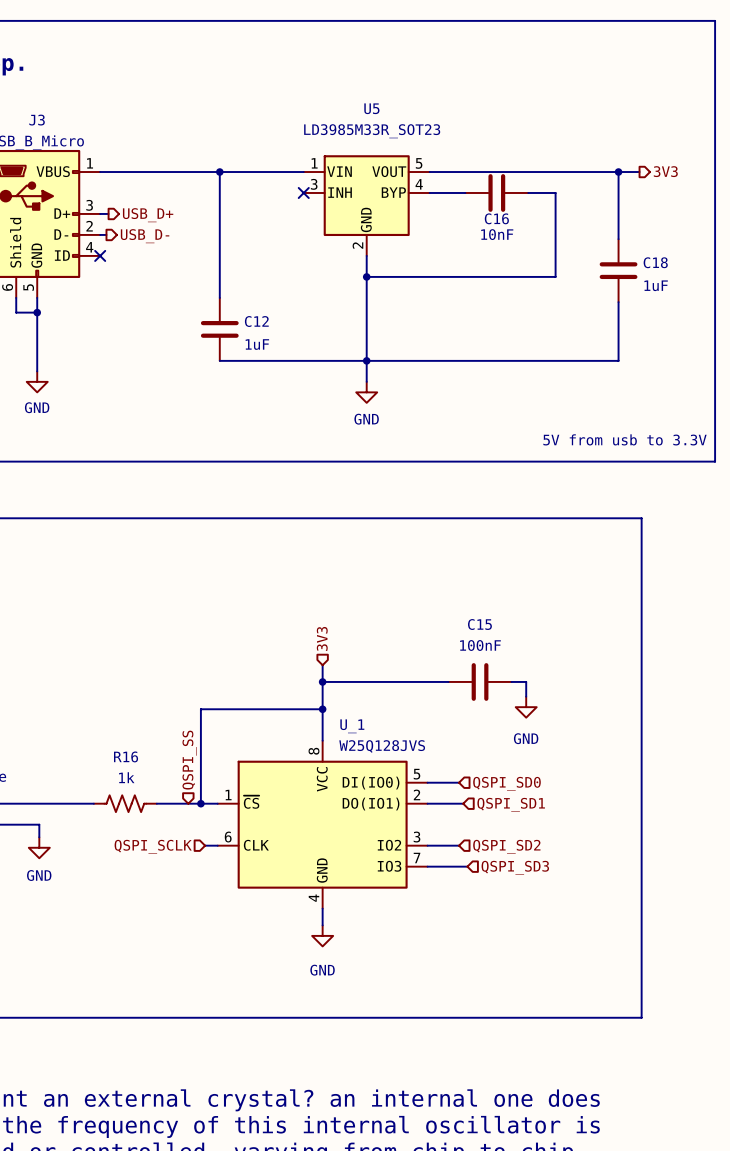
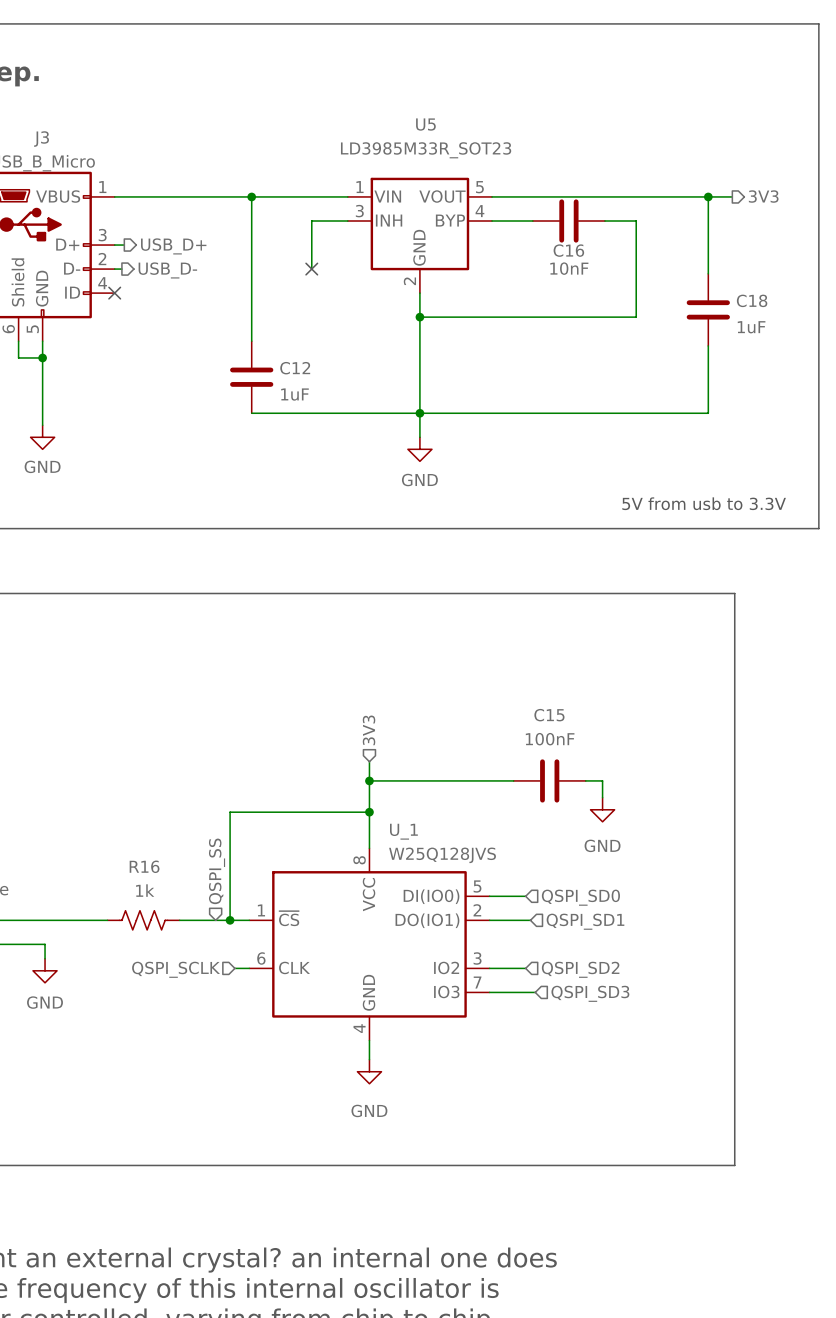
wire: none -> (347, 221) (311, 221) (311, 269)
no-connect mark: (303, 192) -> none
no-connect mark: none -> (311, 269)

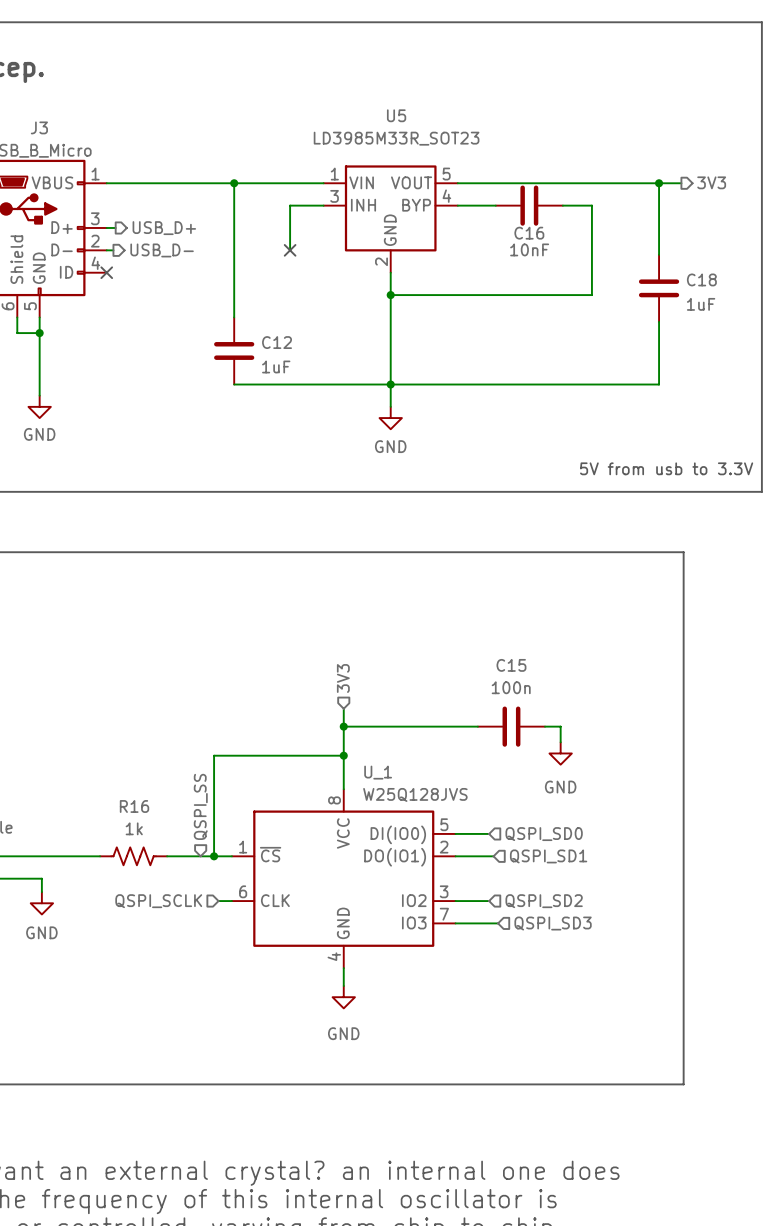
C15 value: 100nF (550, 739) -> 100n (511, 687)

